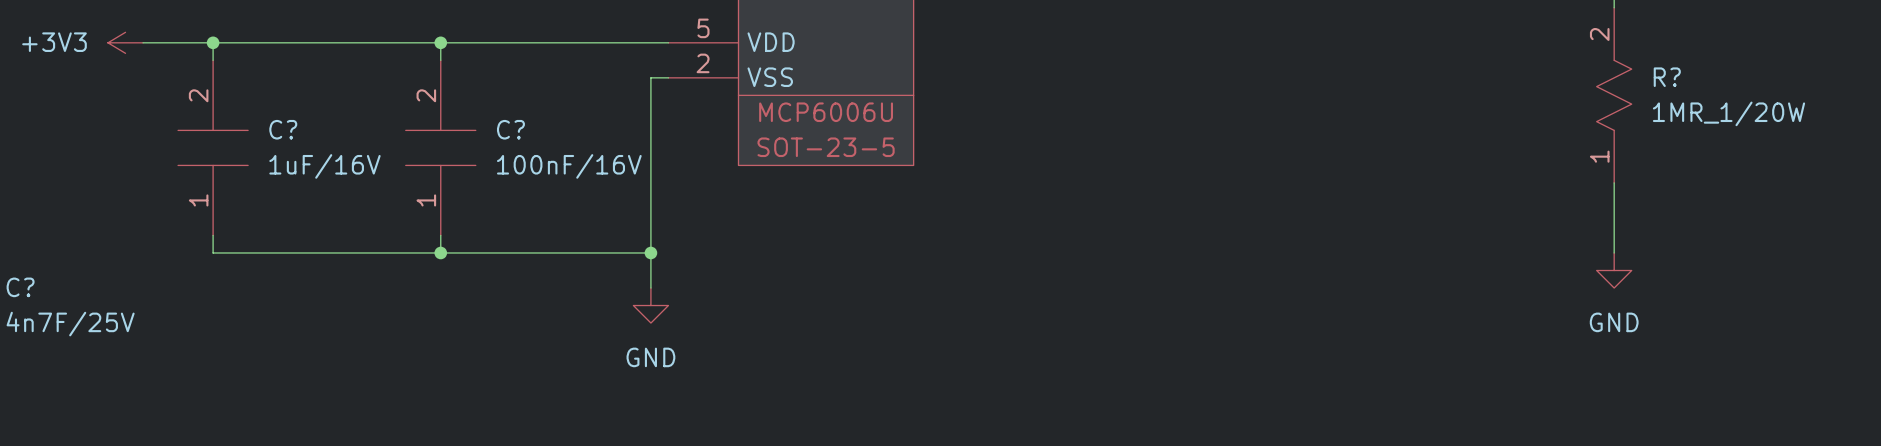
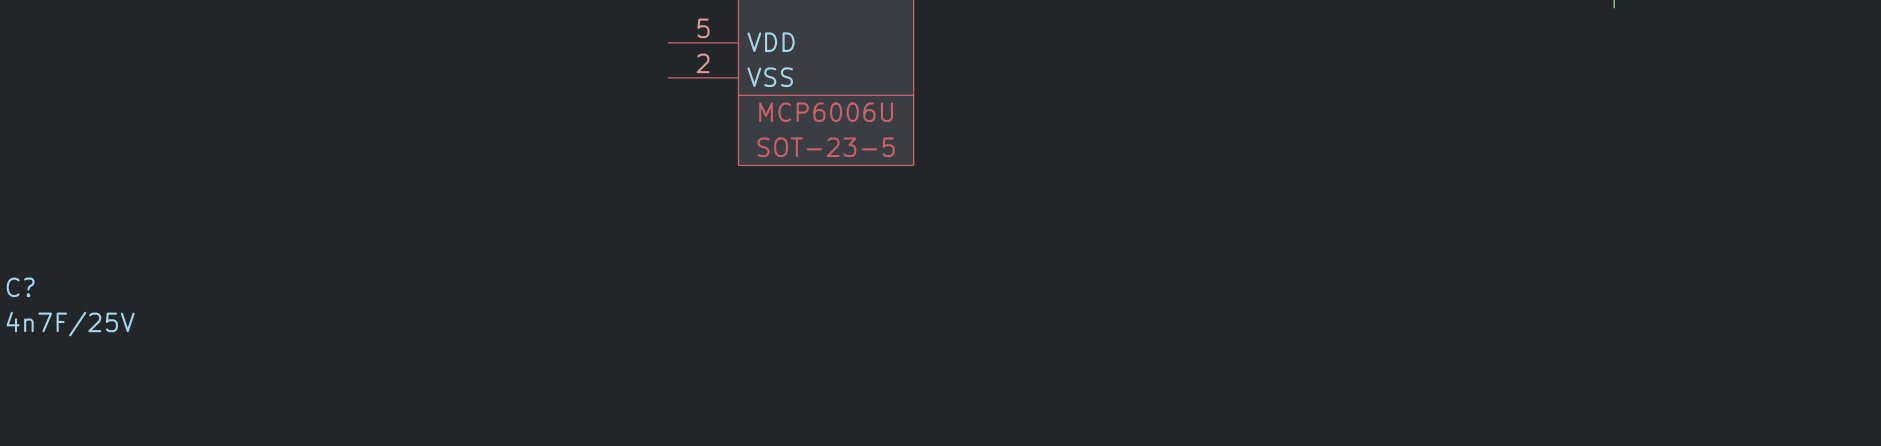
power symbol: +3V3 (125, 42) -> none
wire: (143, 42) (668, 42) -> none
wire: (213, 42) (213, 60) -> none
junction: (213, 42) -> none
wire: (440, 42) (440, 60) -> none
junction: (440, 42) -> none
wire: (668, 77) (650, 77) (650, 288) -> none
R?: 1MR_1/20W (1614, 95) -> none
C?: 1uF/16V (213, 147) -> none
C?: 100nF/16V (440, 147) -> none
wire: (1614, 182) (1614, 252) -> none
wire: (213, 235) (213, 252) (650, 252) -> none
wire: (440, 235) (440, 252) -> none
junction: (440, 252) -> none
junction: (650, 252) -> none
power symbol: GND (1614, 270) -> none
power symbol: GND (650, 305) -> none

